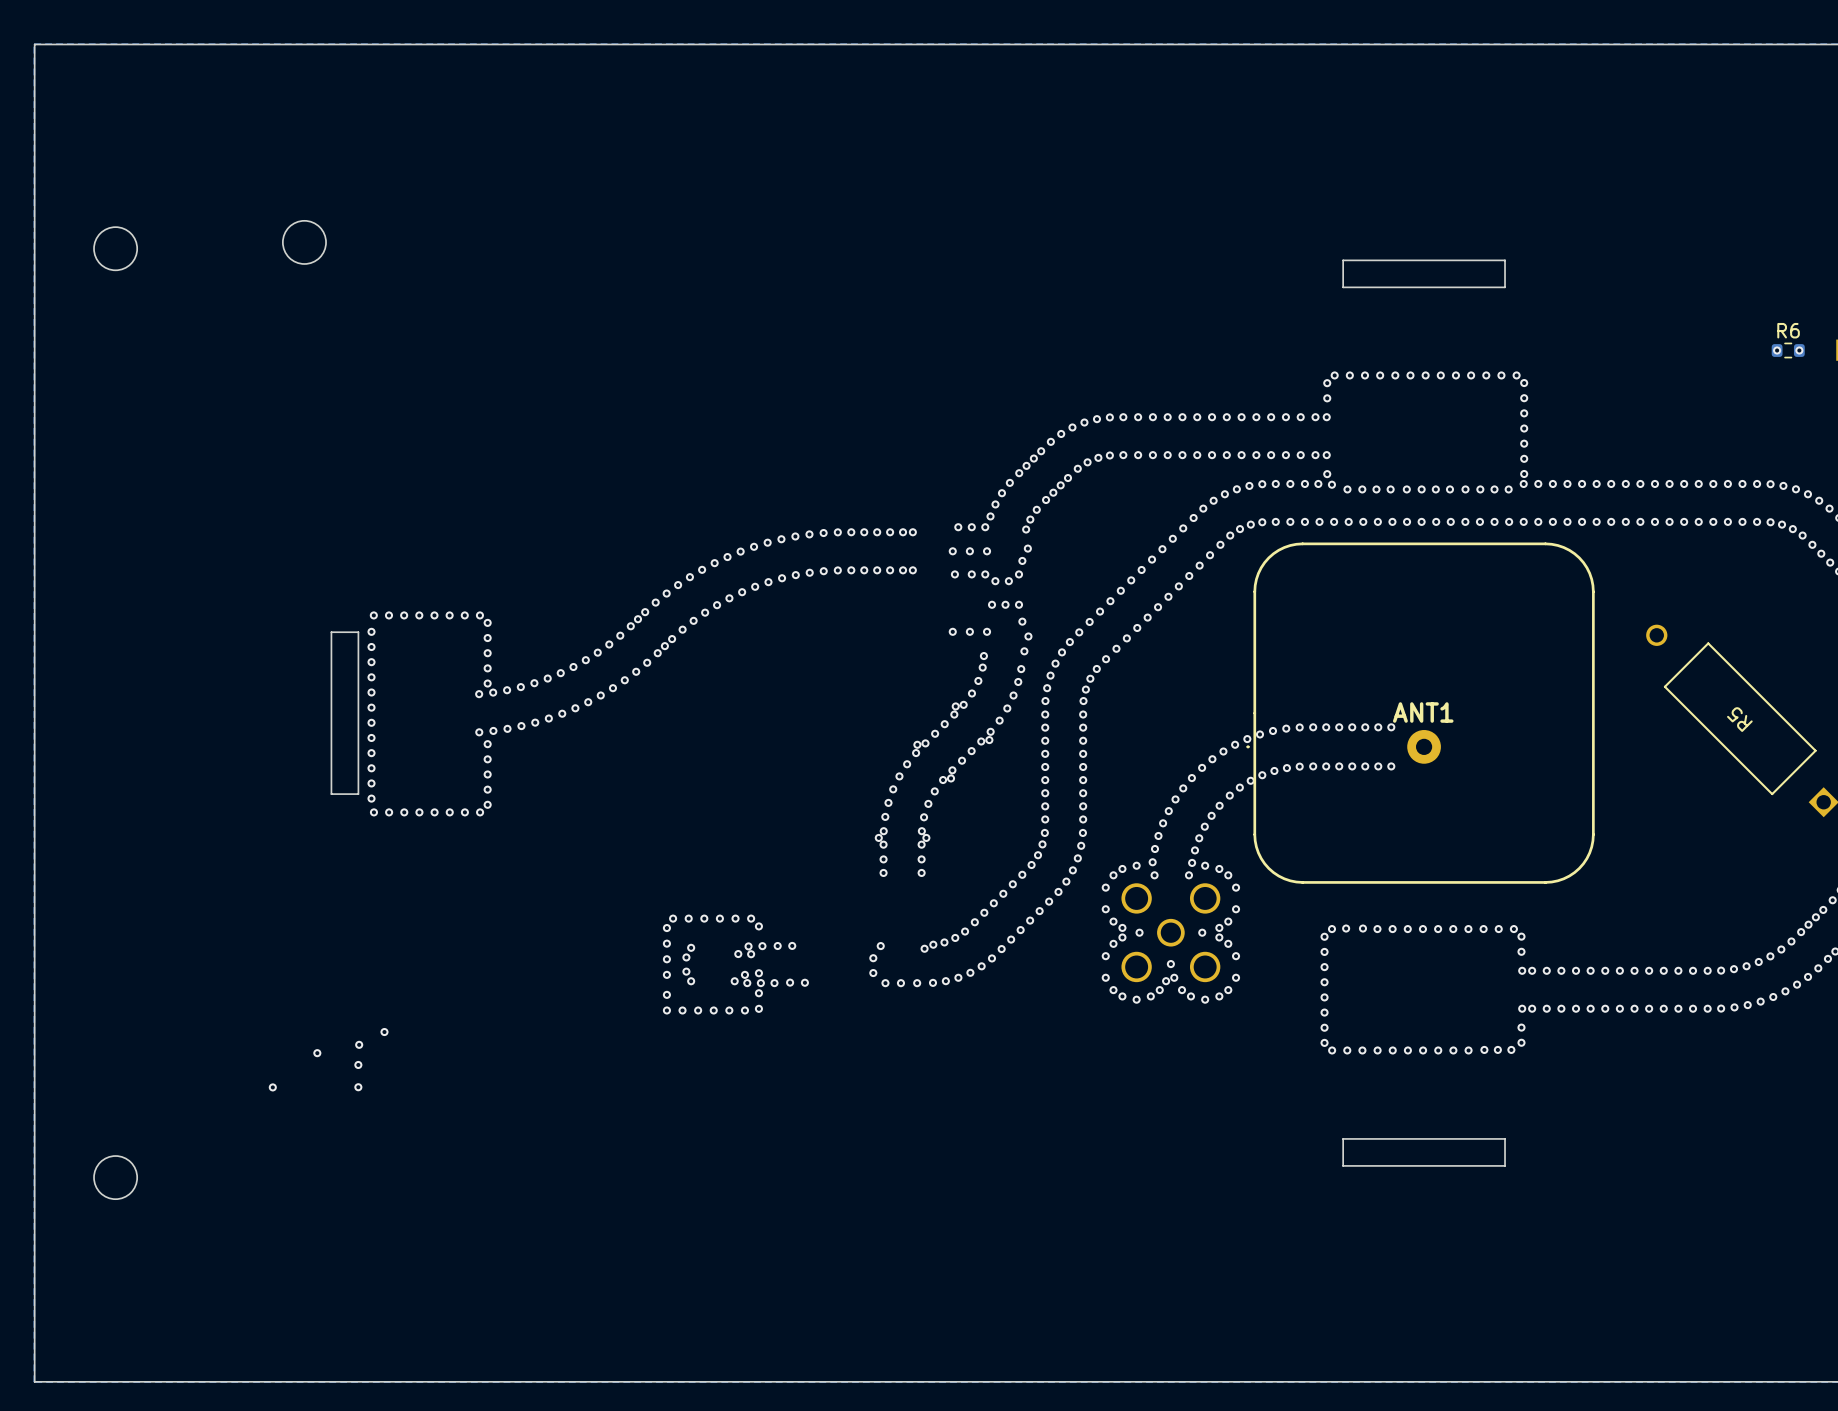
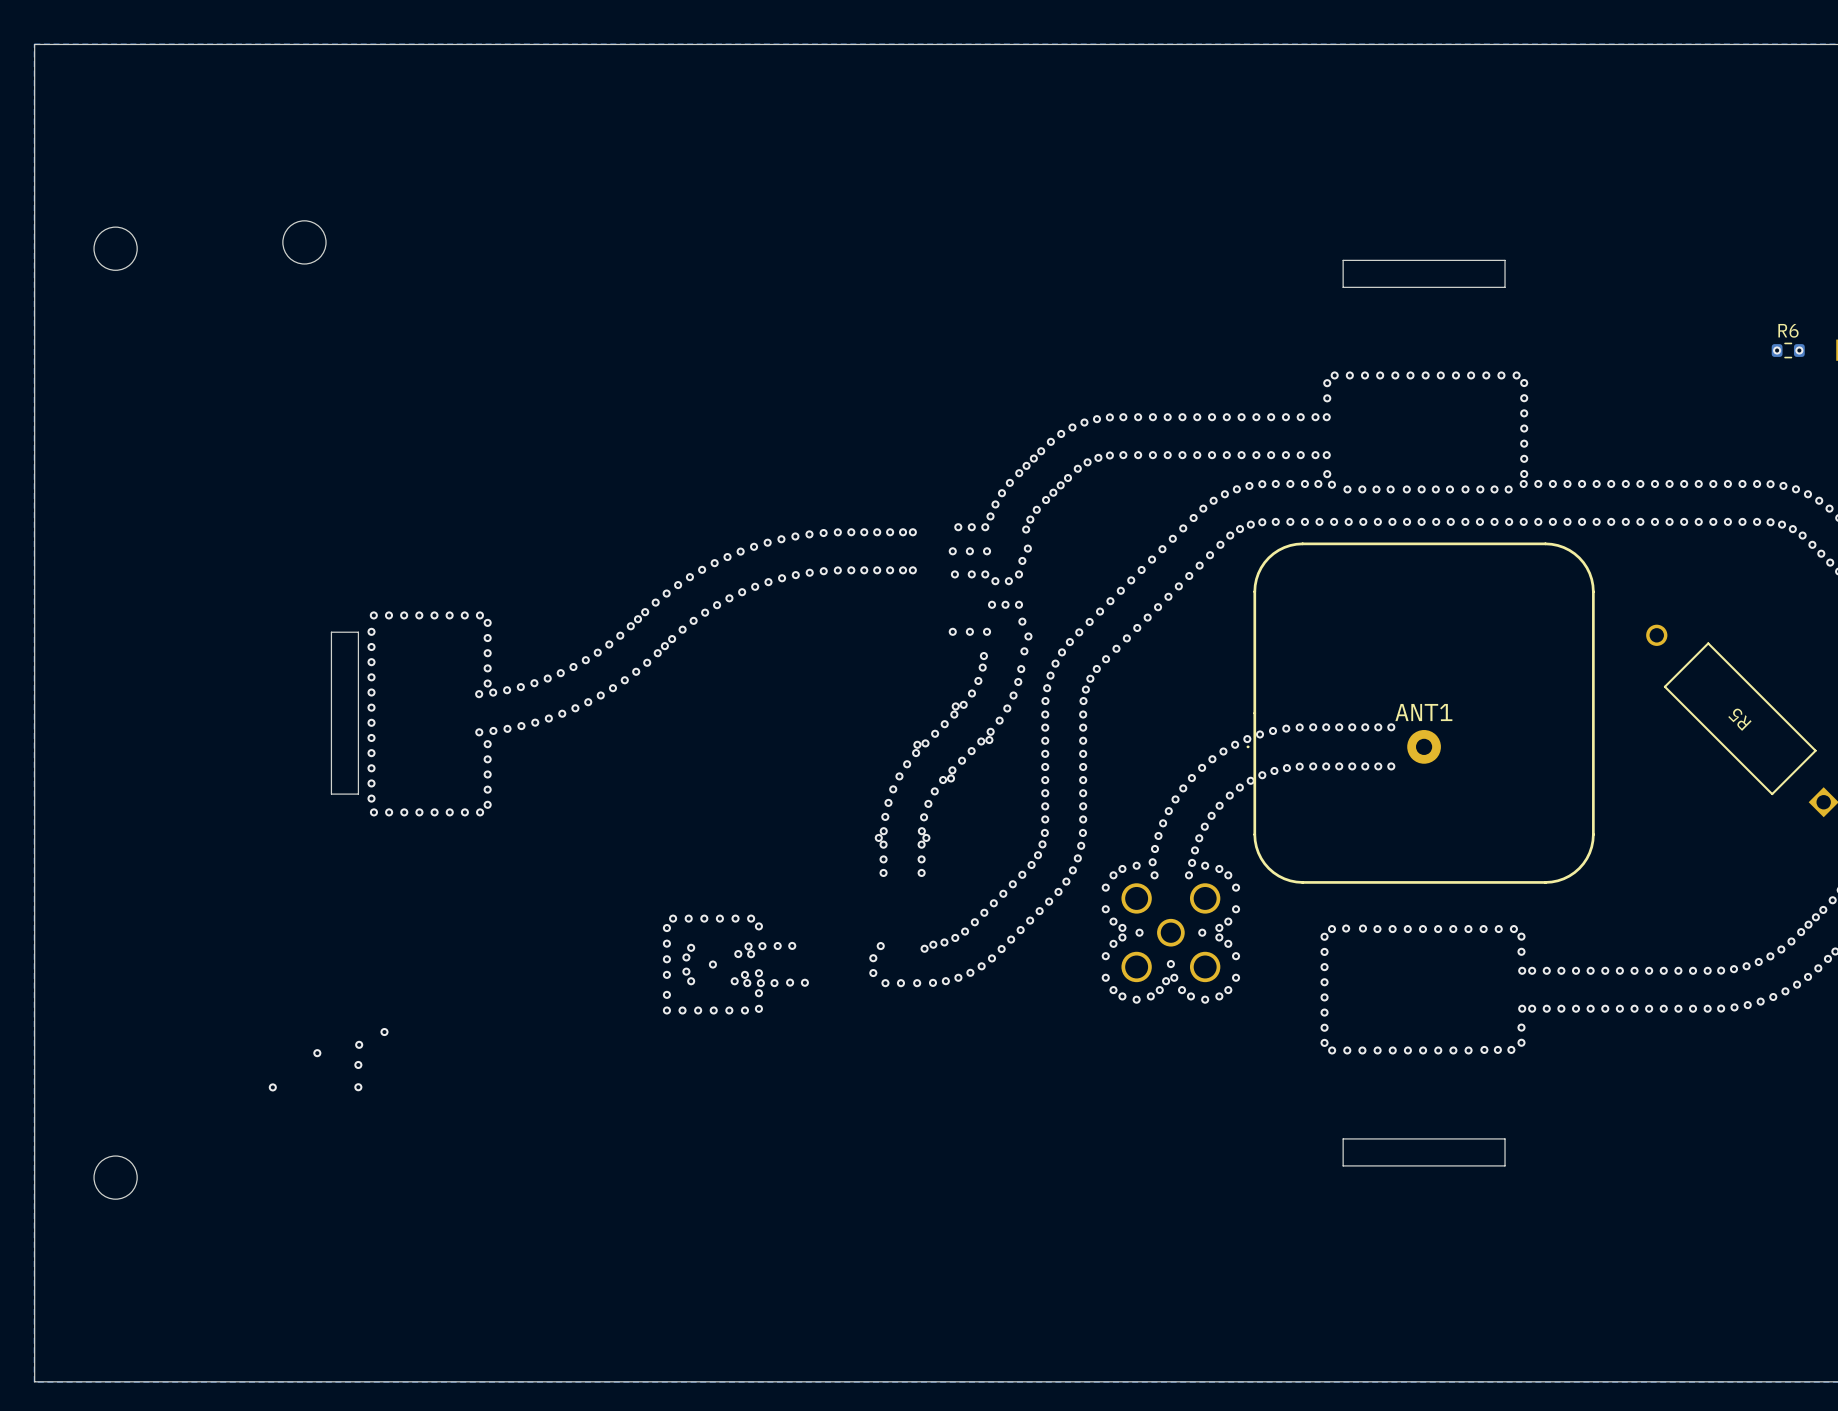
via: none -> (712, 964)

